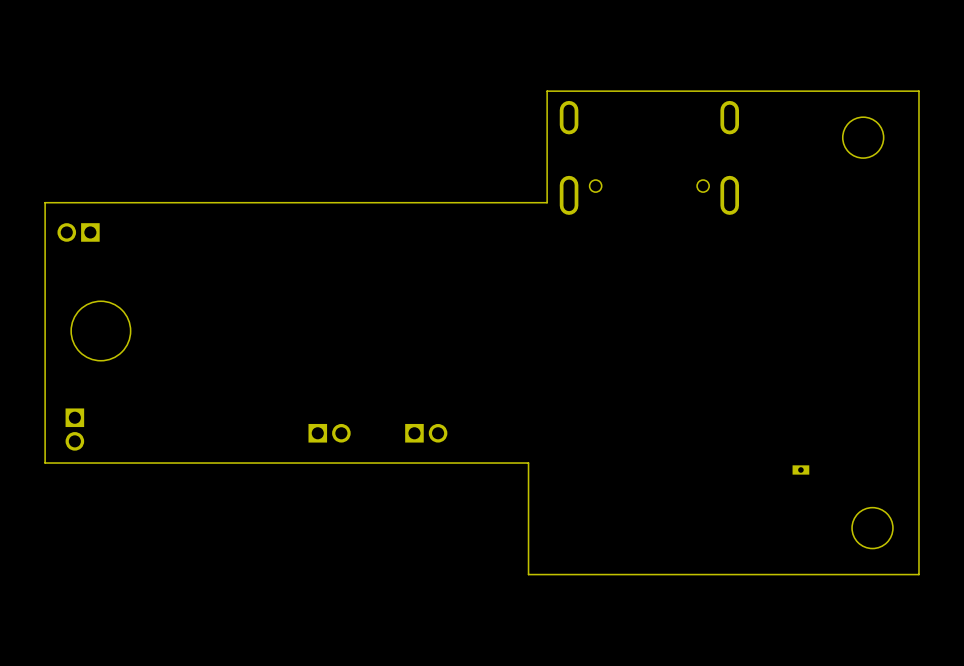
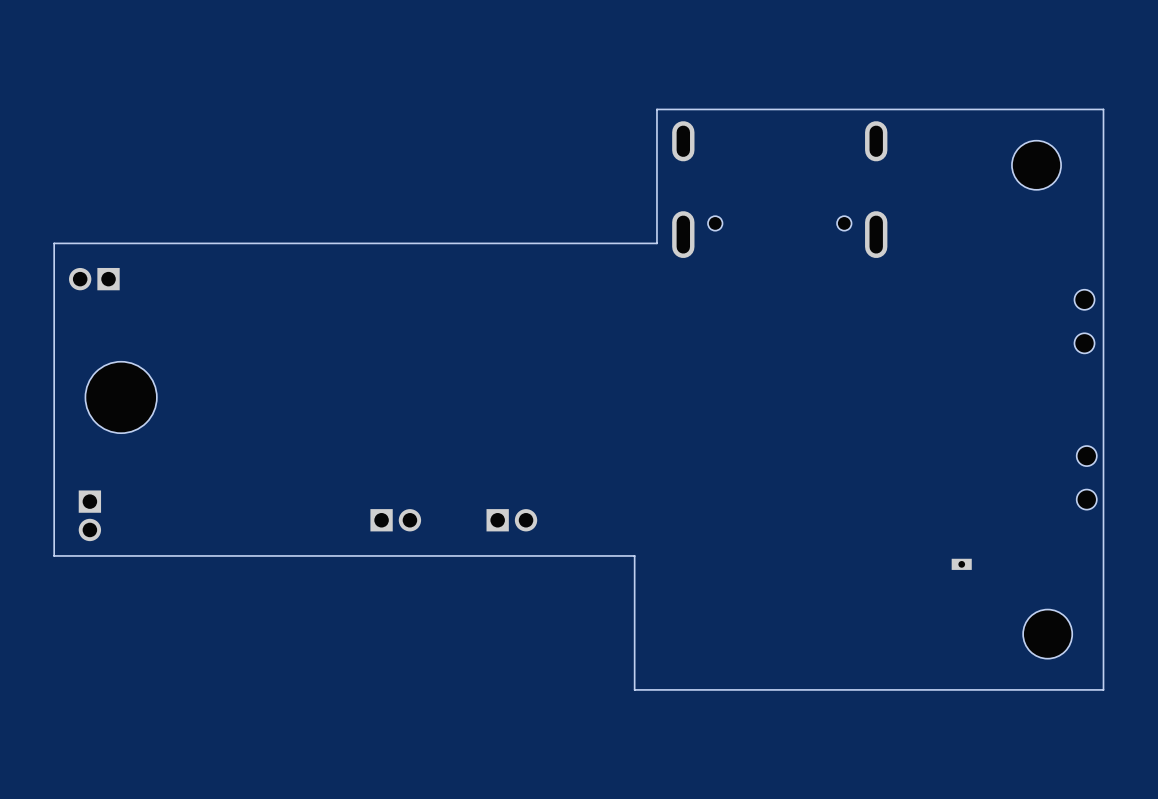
part: none -> (1084, 321)
part: none -> (1086, 477)

